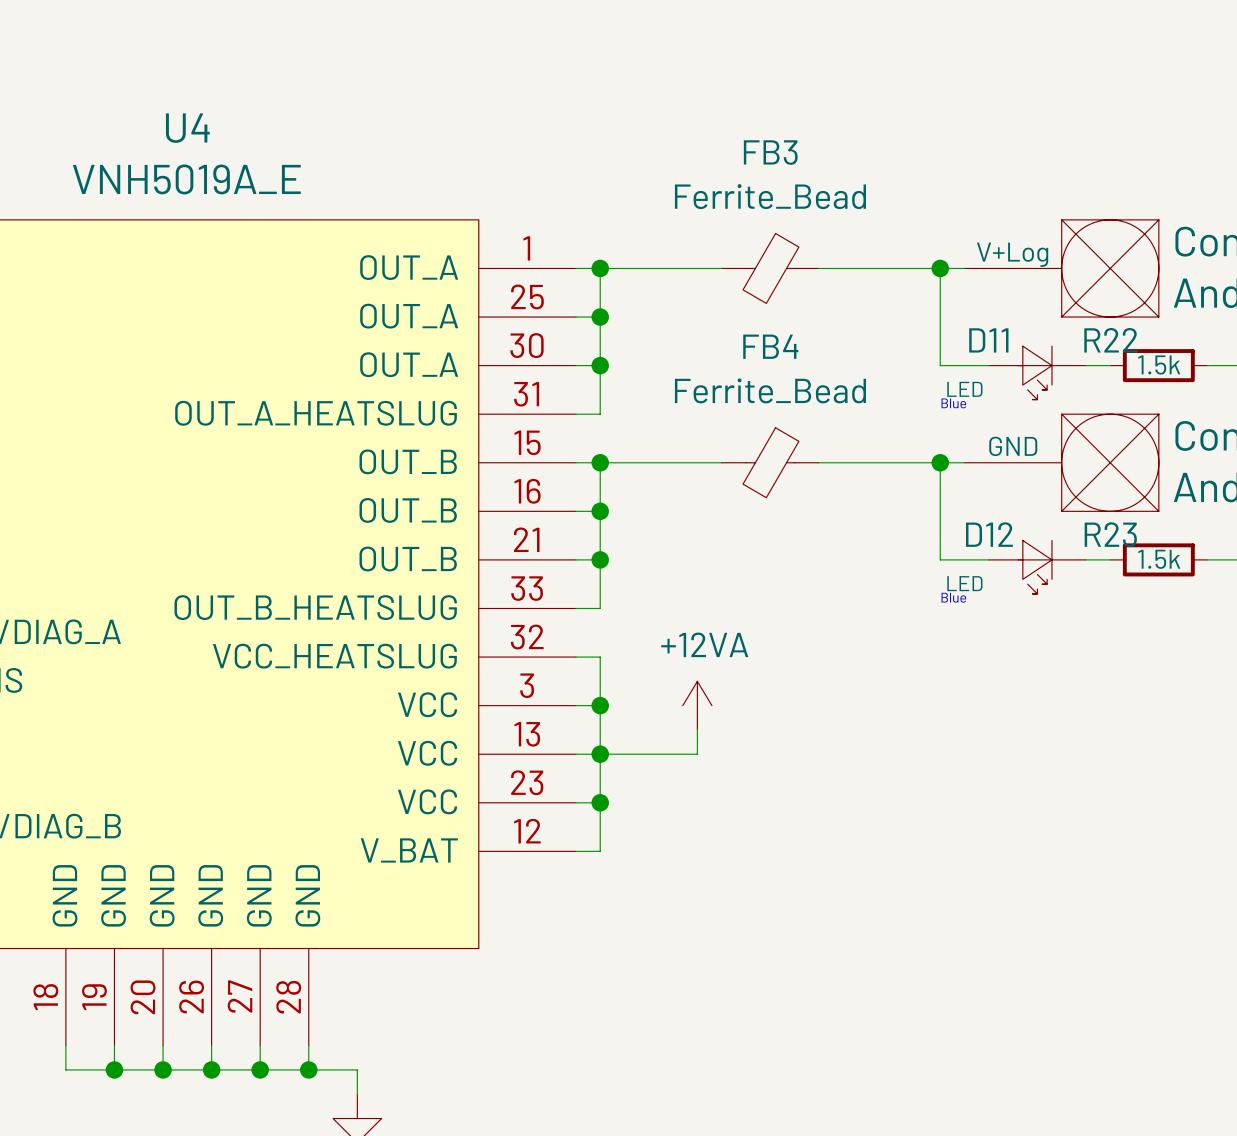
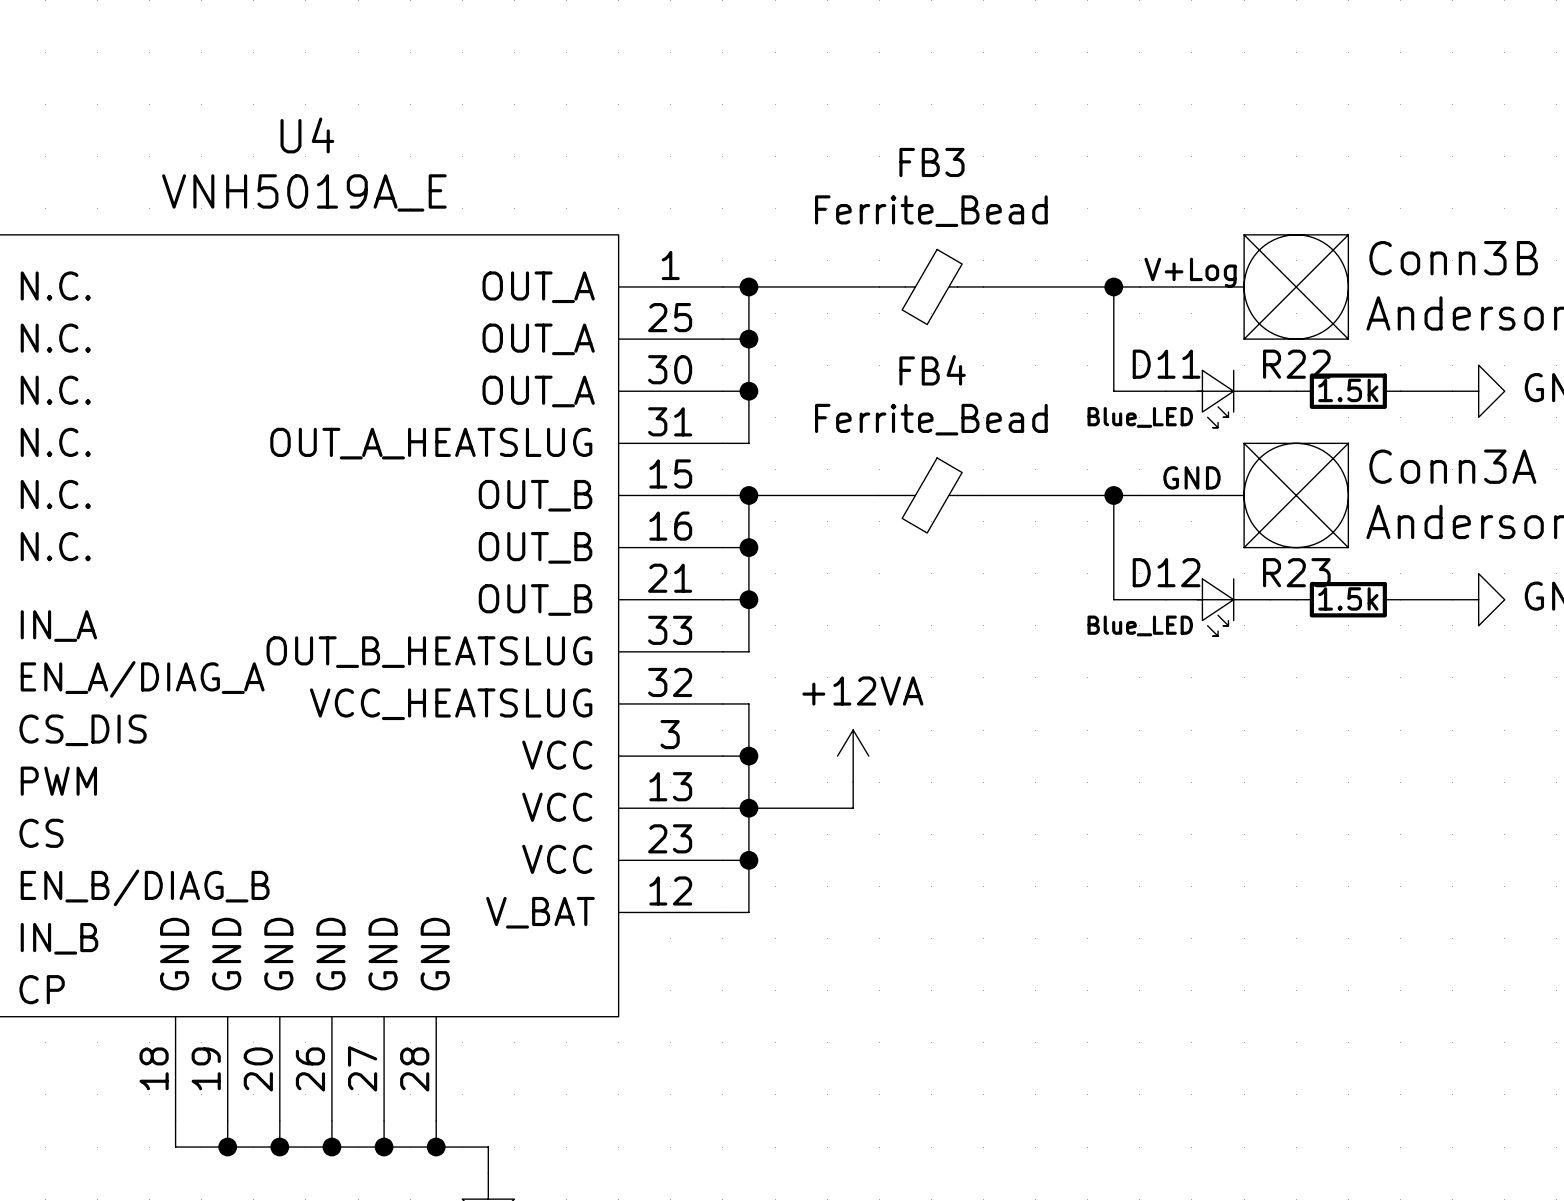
D11 value: LED (964, 389) -> Blue_LED (1140, 417)
text: Blue (953, 403) -> none
D12 value: LED (964, 583) -> Blue_LED (1140, 625)
text: Blue (953, 597) -> none

